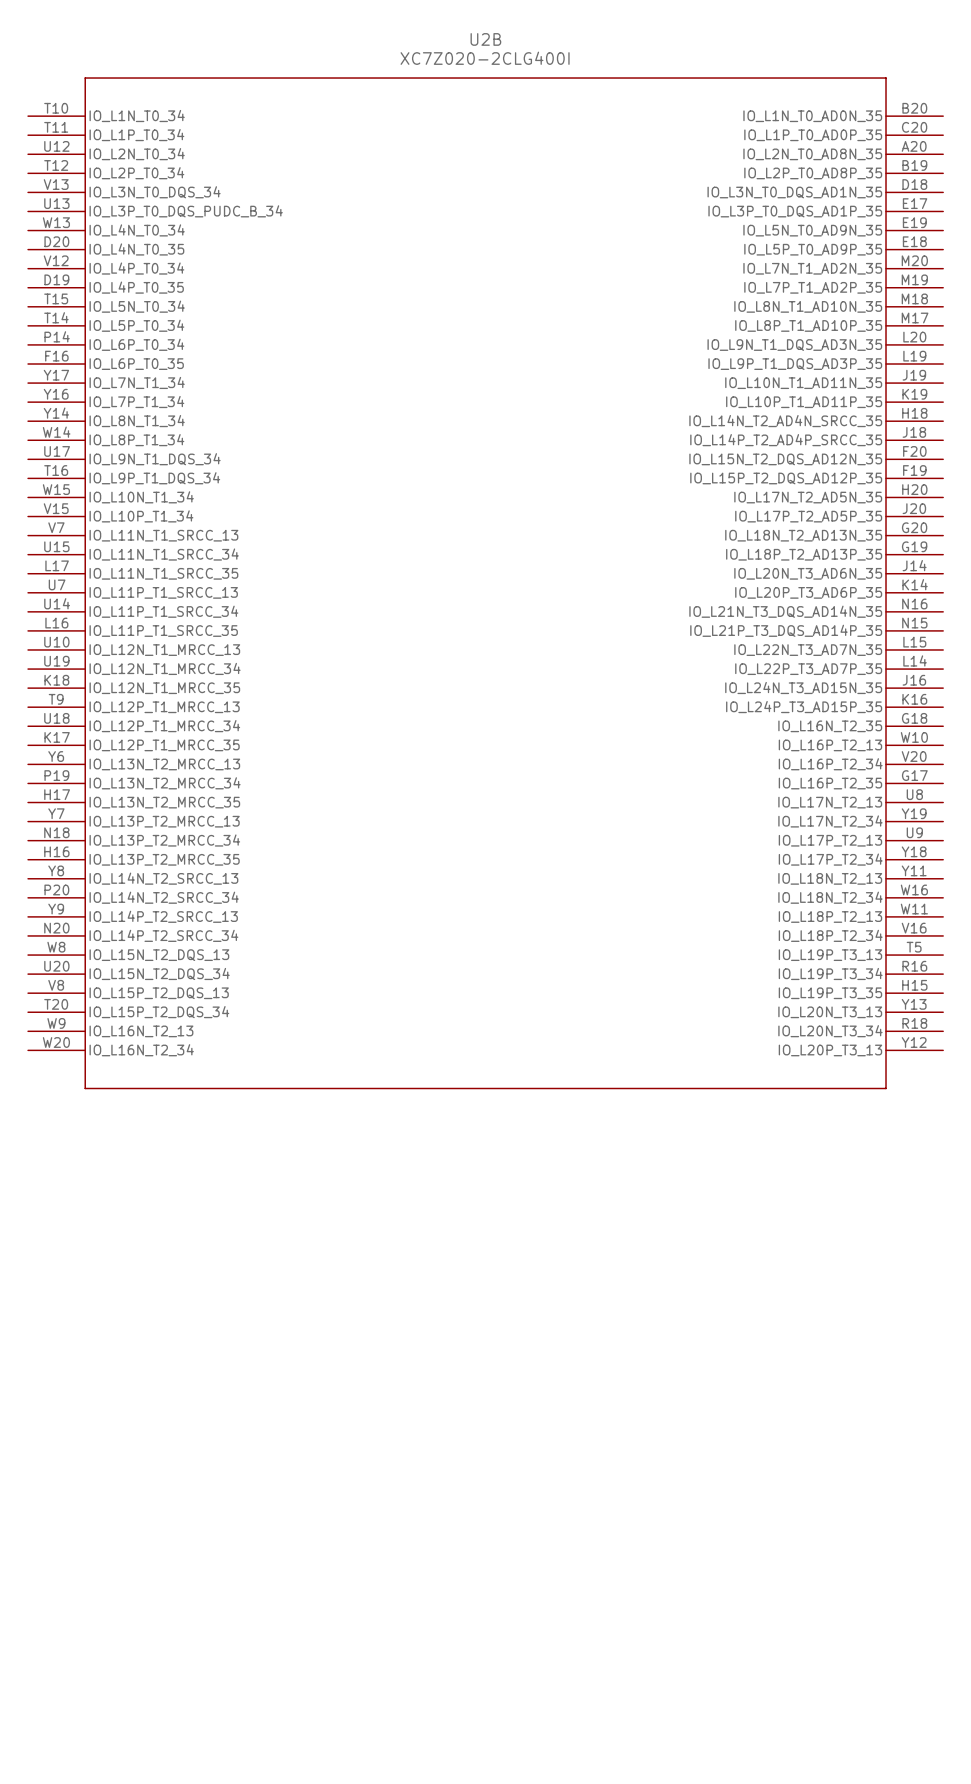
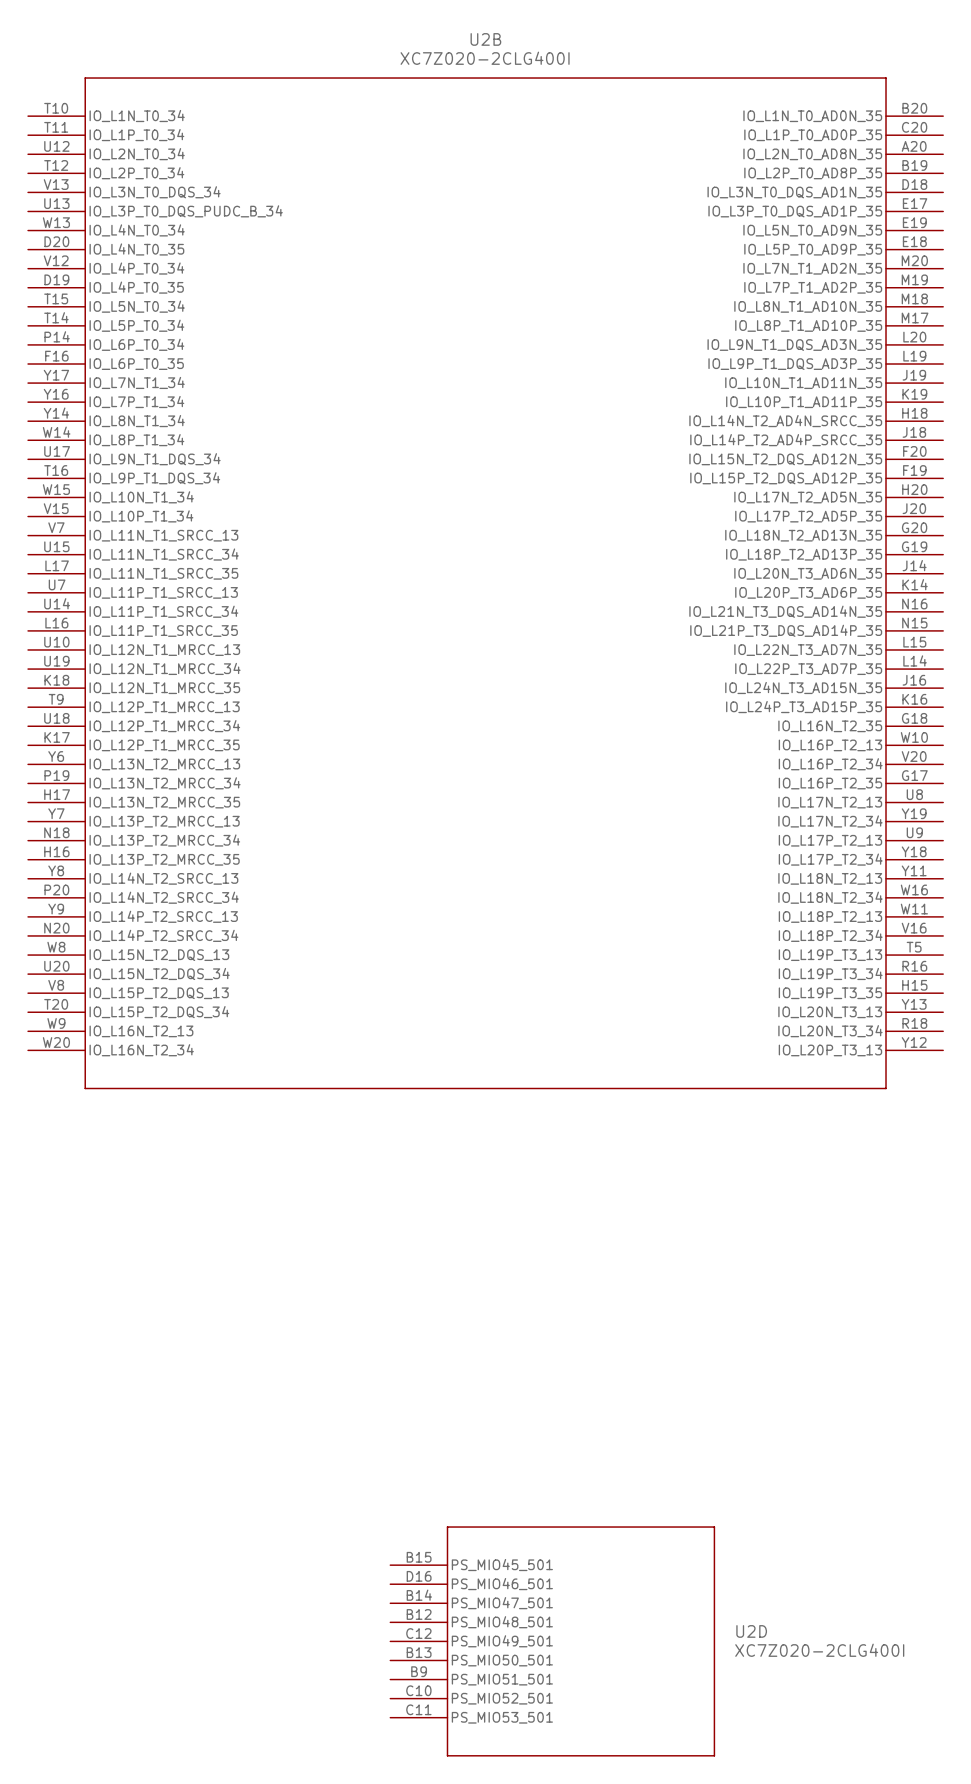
U2D: none -> XC7Z020-2CLG400I (552, 1641)

